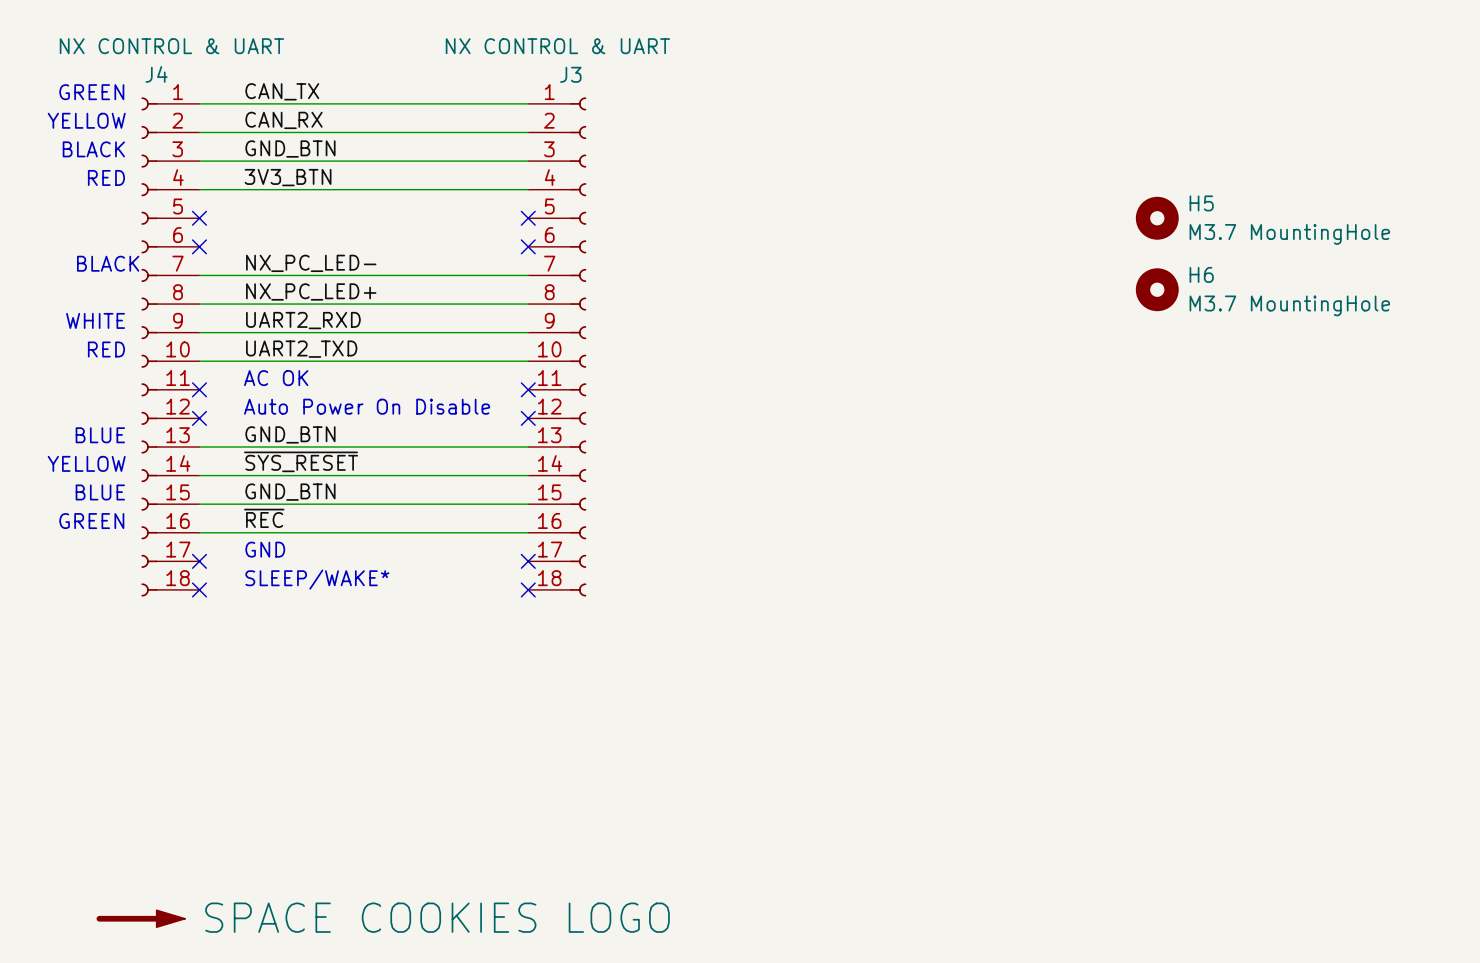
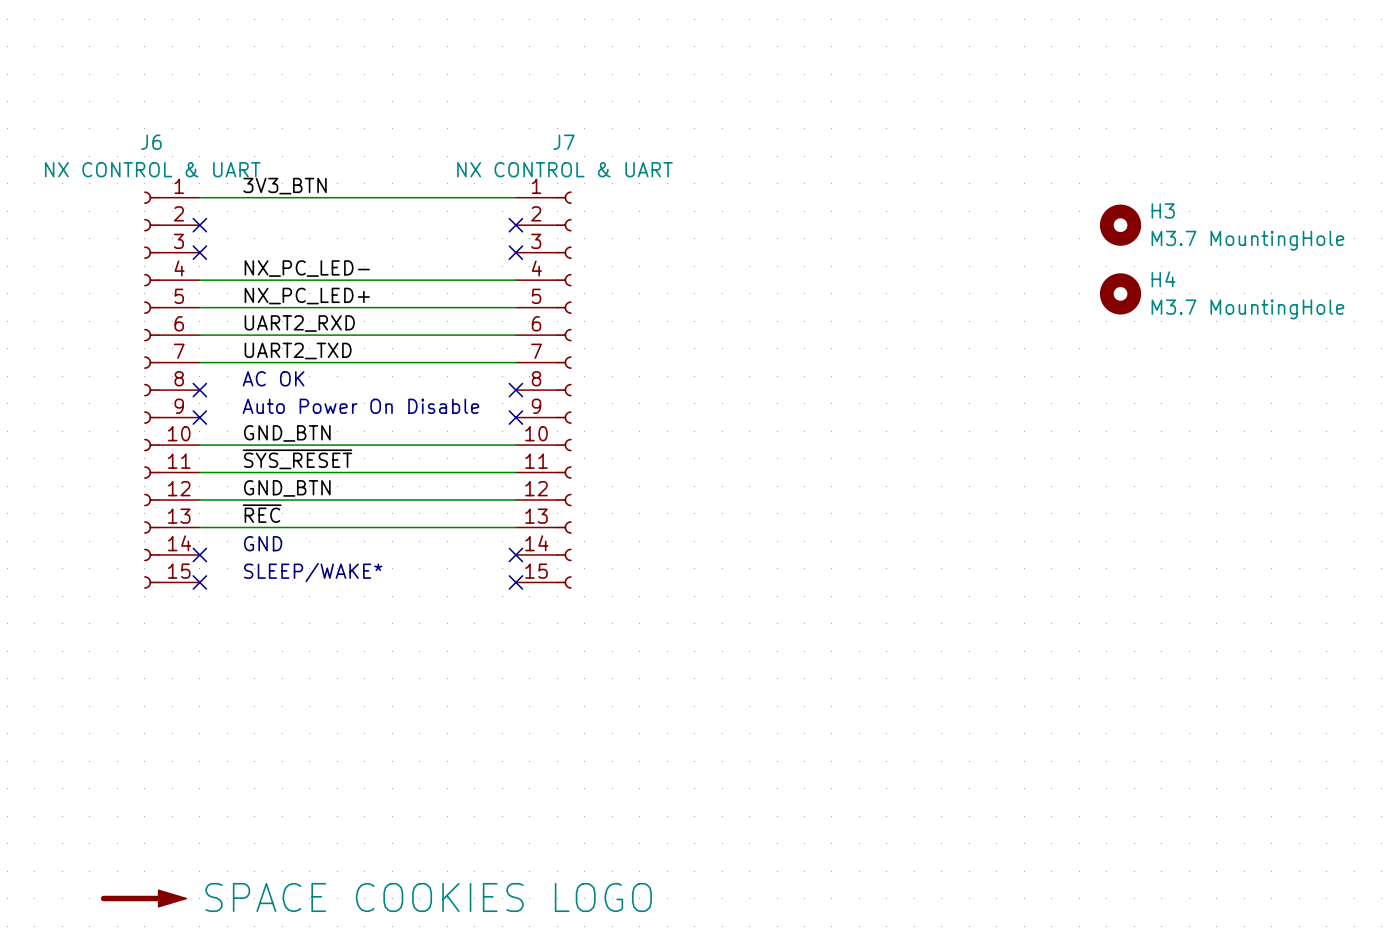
label: CAN_TX (282, 91) -> none
text: GREEN (91, 92) -> none
wire: (199, 103) (528, 103) -> none
text: YELLOW (86, 120) -> none
label: CAN_RX (283, 120) -> none
wire: (199, 132) (528, 132) -> none
text: BLACK (93, 149) -> none
label: GND_BTN (290, 149) -> none
wire: (199, 161) (528, 161) -> none
text: RED (106, 177) -> none
H5 name: H5 (1201, 203) -> H3 (1163, 210)
text: BLACK (108, 263) -> none
H6 name: H6 (1201, 274) -> H4 (1163, 279)
text: WHITE (95, 320) -> none
J4: NX CONTROL & UART (170, 346) -> none
J3: NX CONTROL & UART (557, 346) -> none
text: RED (106, 349) -> none
J6: none -> NX CONTROL & UART (171, 390)
J7: none -> NX CONTROL & UART (543, 390)
text: BLUE (100, 435) -> none
text: YELLOW (86, 463) -> none
text: BLUE (100, 492) -> none
text: GREEN (91, 521) -> none

